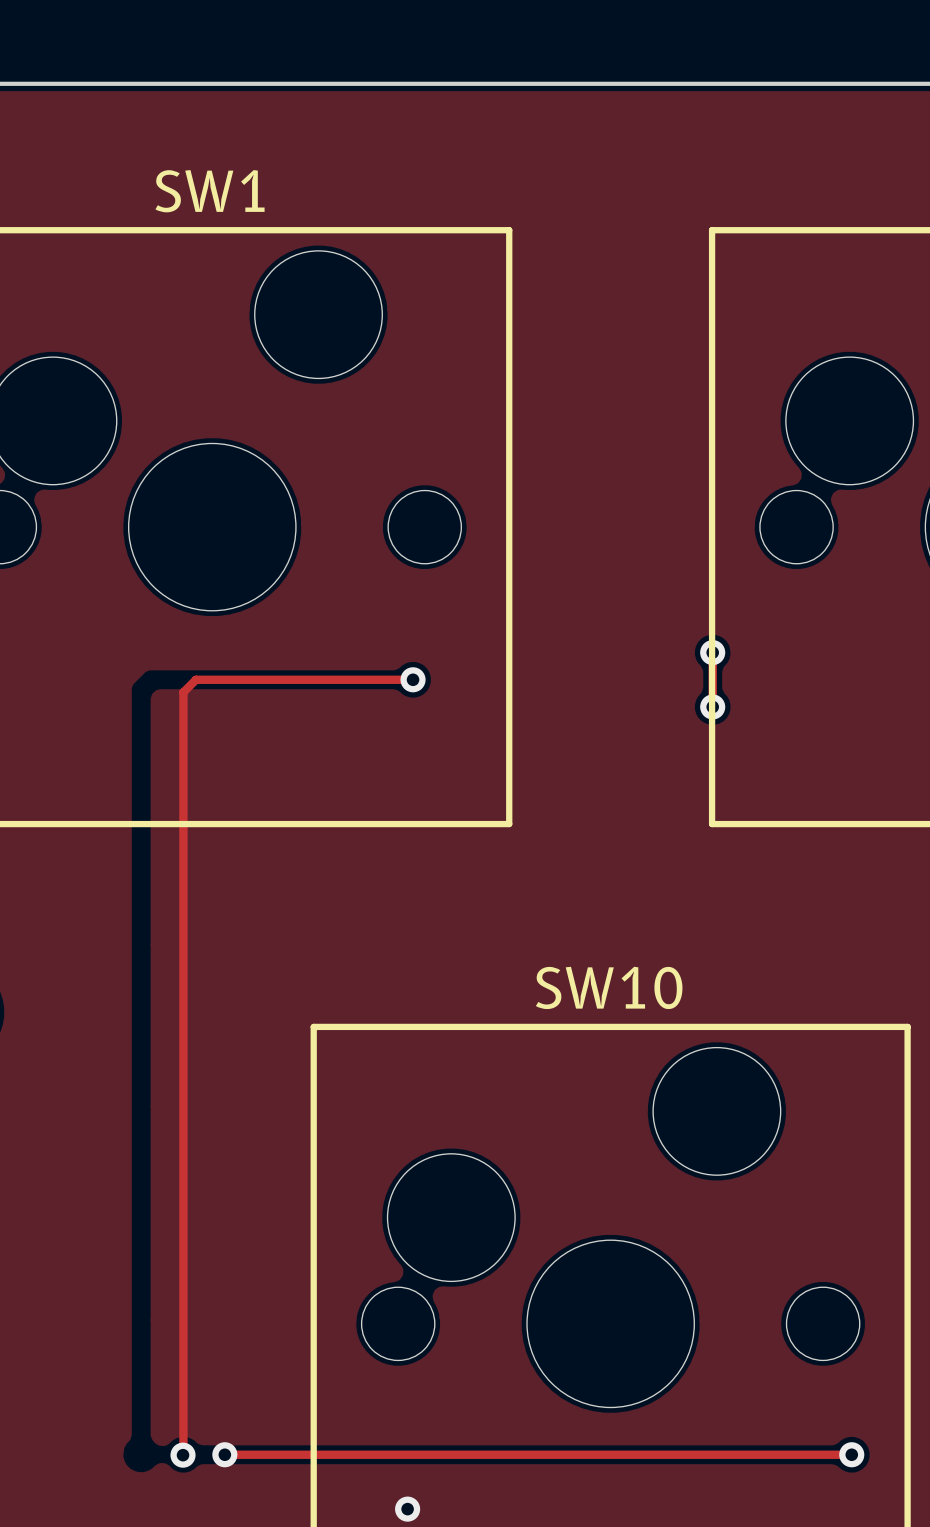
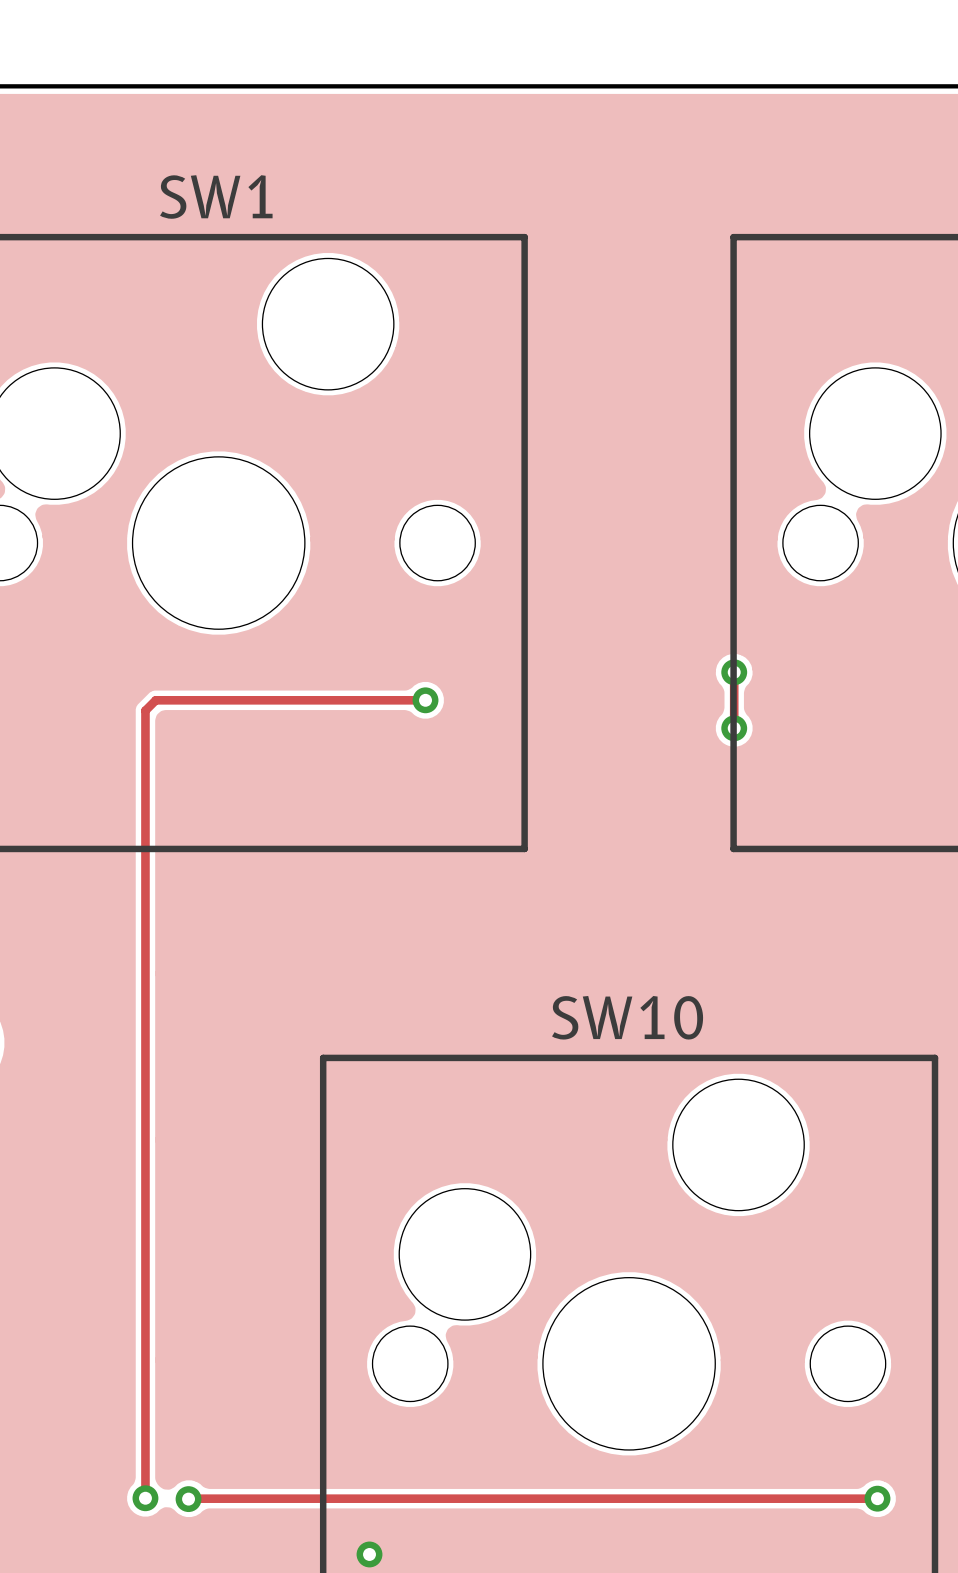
track: (195, 679) (183, 692) (183, 1454) -> (201, 700) (155, 700) (145, 710) (145, 1498)
via: none -> (145, 1498)
track: none -> (188, 1498) (231, 1498)
via: (224, 1454) -> none
via: none -> (369, 1554)
via: (407, 1509) -> none

